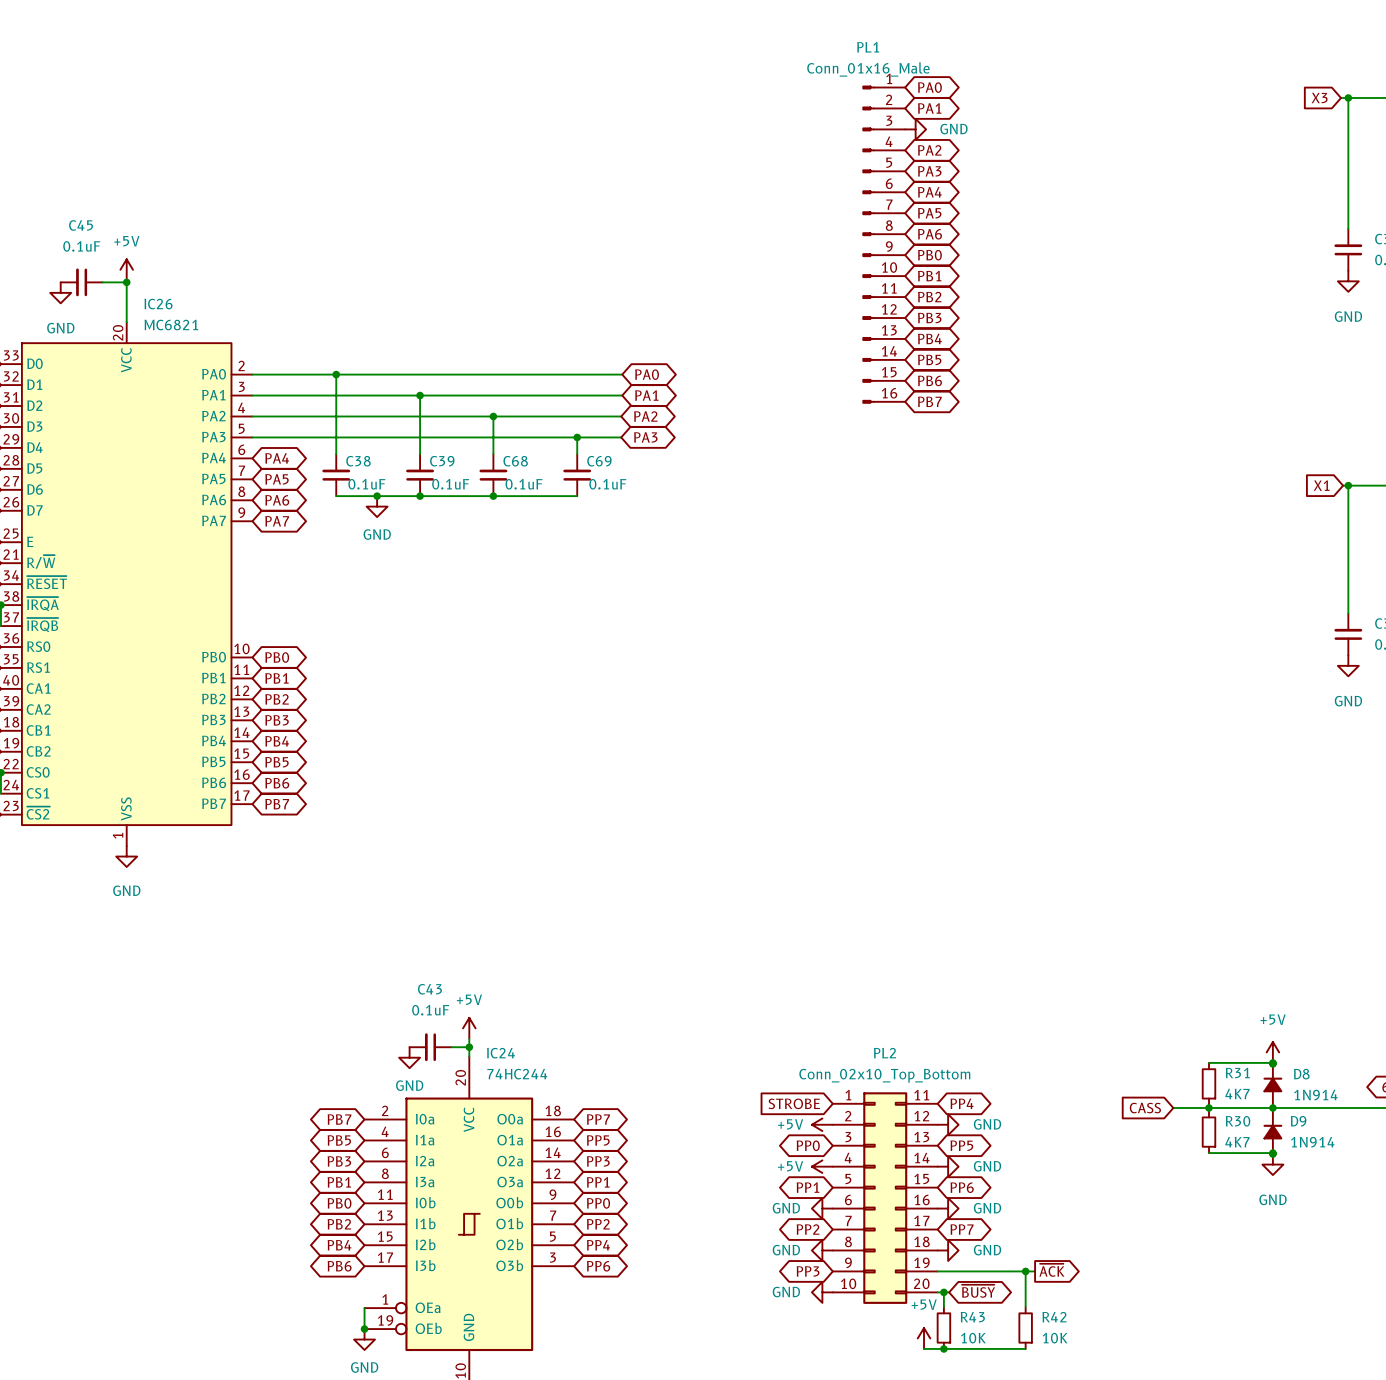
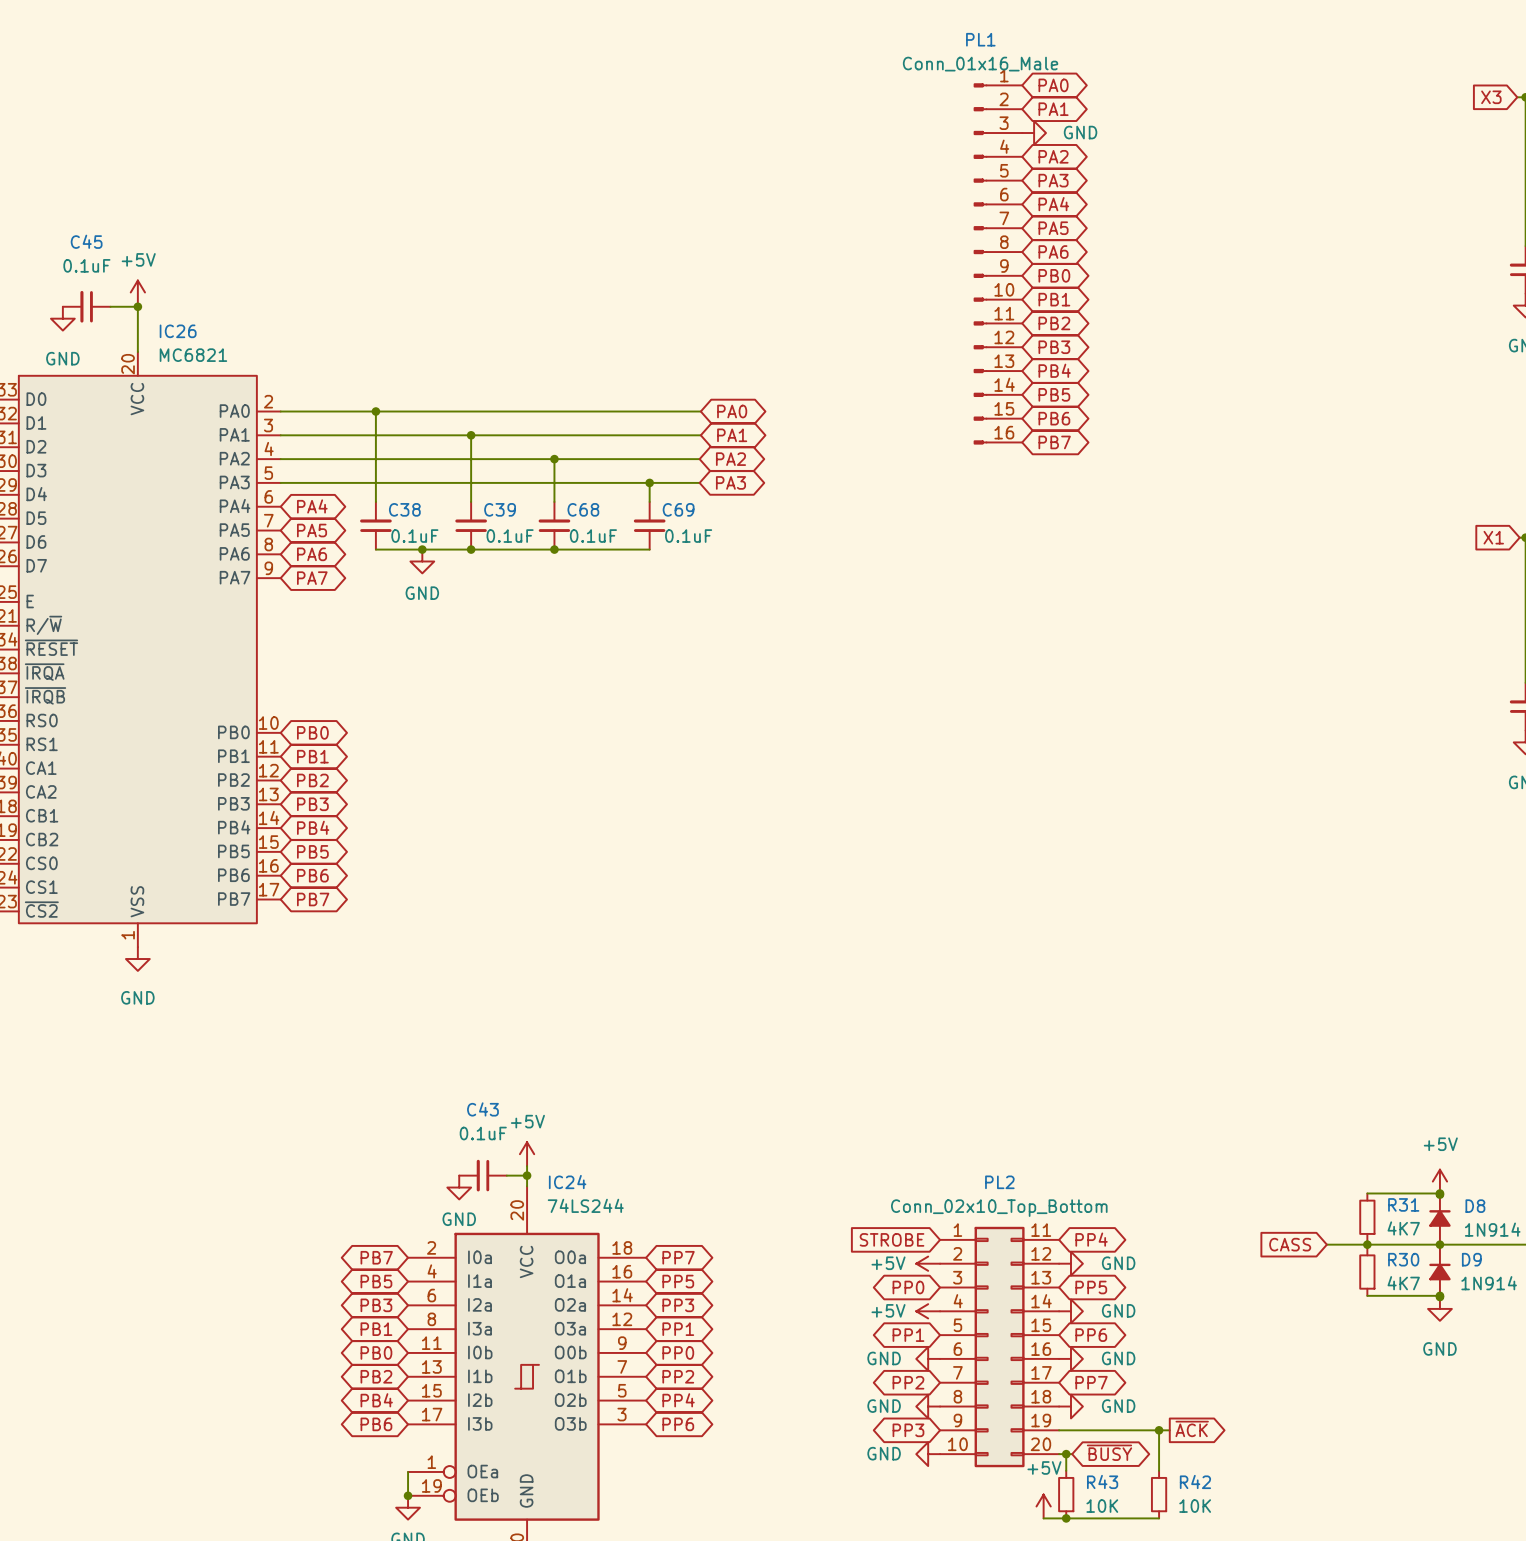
IC24 value: 74HC244 (517, 1074) -> 74LS244 (585, 1205)

